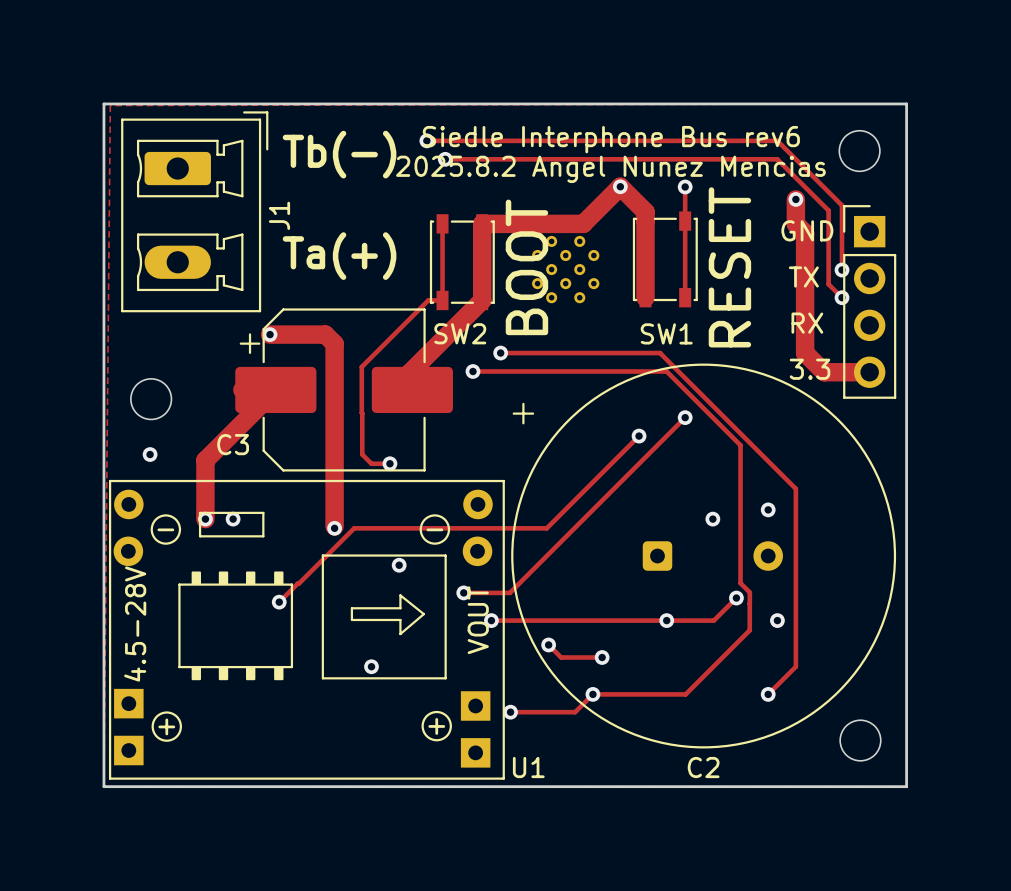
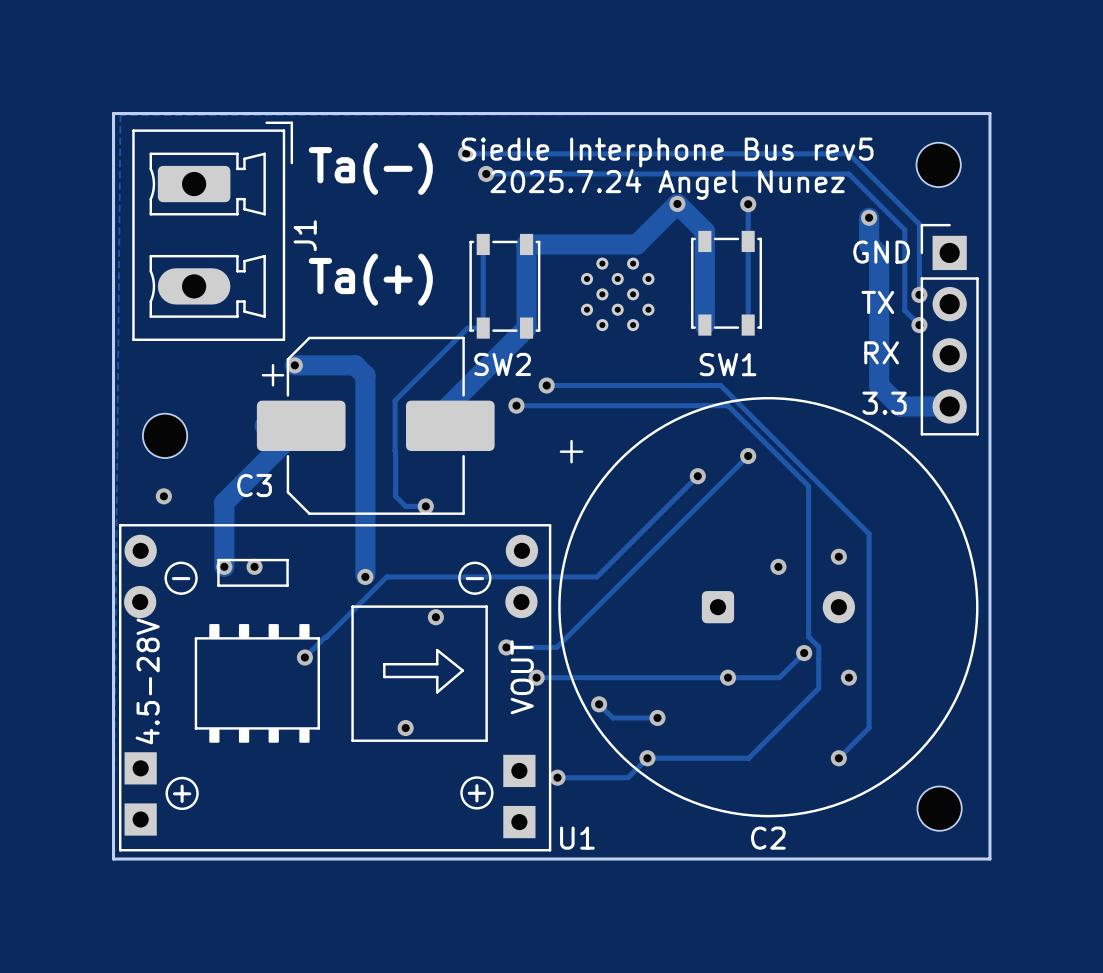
text: Siedle Interphone Bus rev6 (611, 139) -> Siedle Interphone Bus rev5 (667, 152)
text: Tb(-) (339, 154) -> Ta(-) (370, 168)
text: 2025.8.2 Angel Nunez Mencias (610, 169) -> 2025.7.24 Angel Nunez (667, 184)
SW2 value: BOOT (526, 267) -> none
SW1 value: RESET (729, 267) -> none

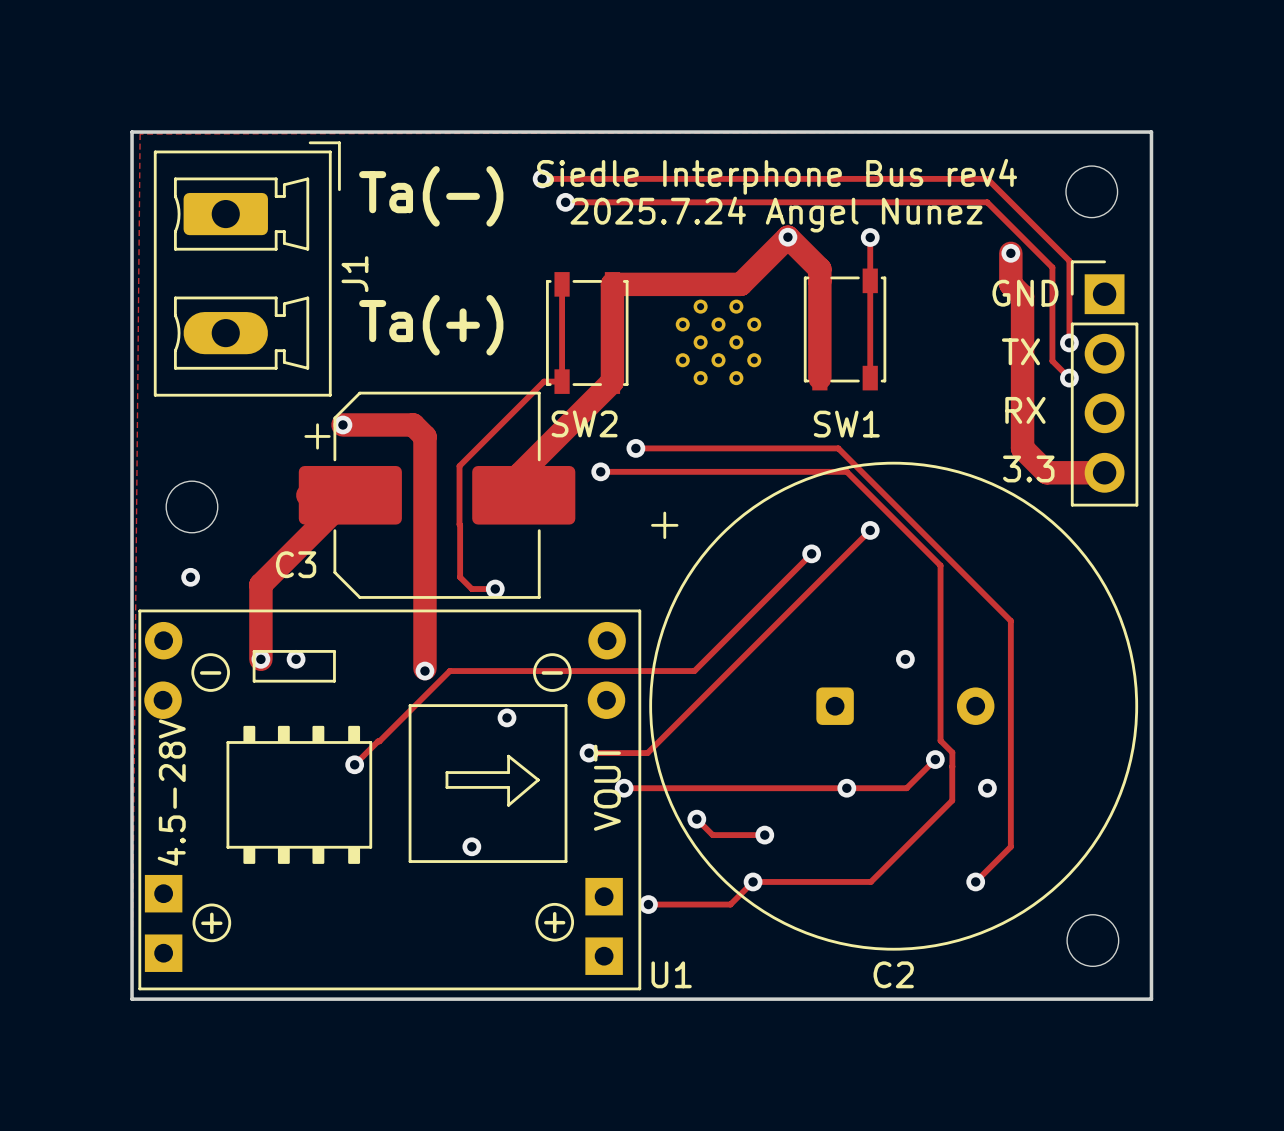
text: Siedle Interphone Bus rev5 (667, 152) -> Siedle Interphone Bus rev4 (777, 176)
via: (838, 556) -> none

